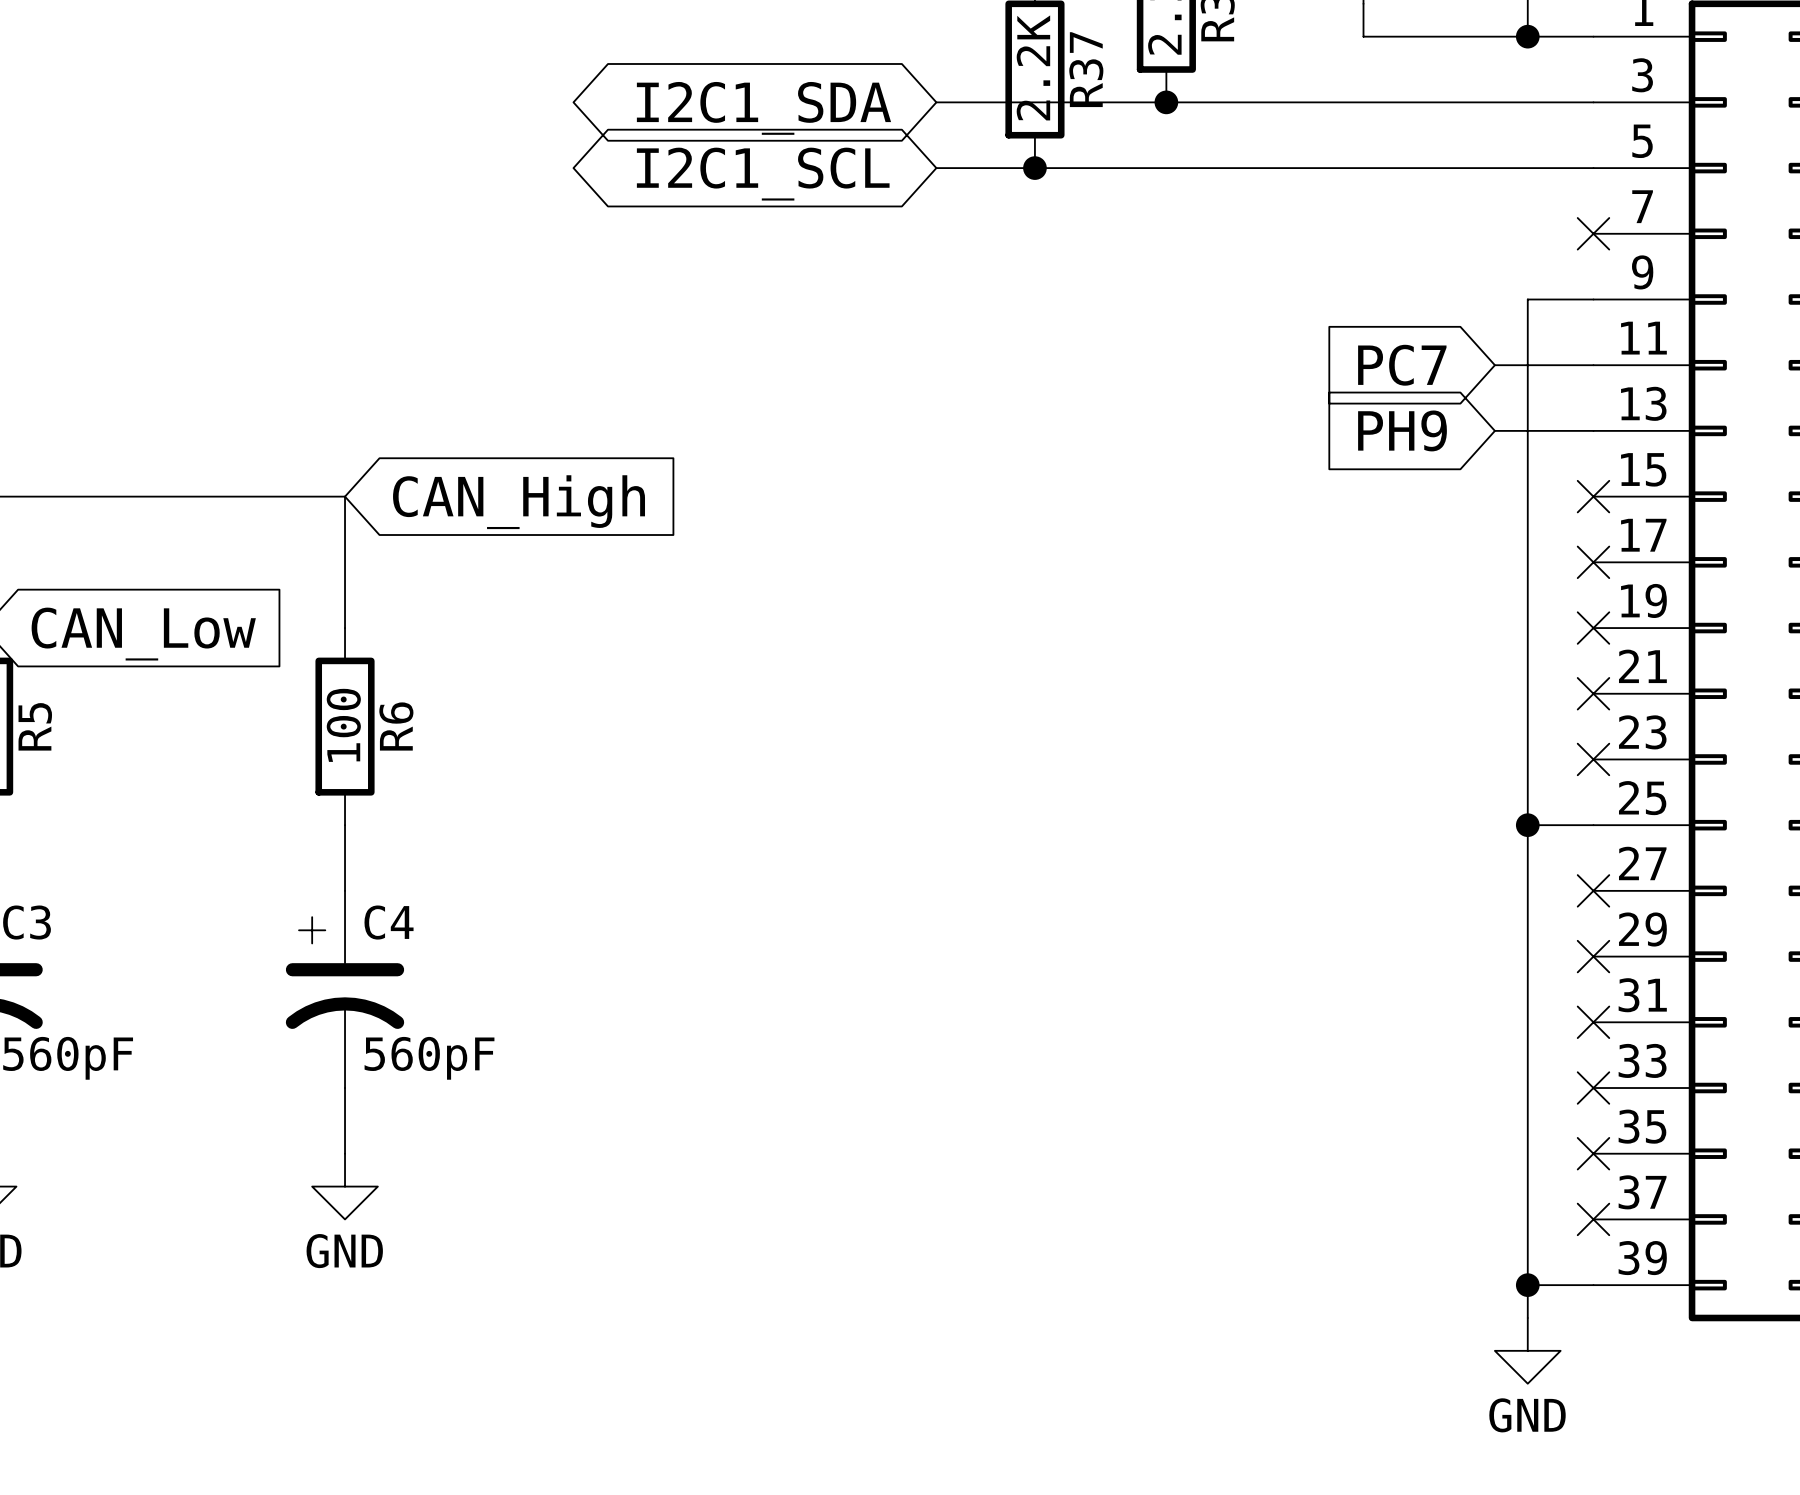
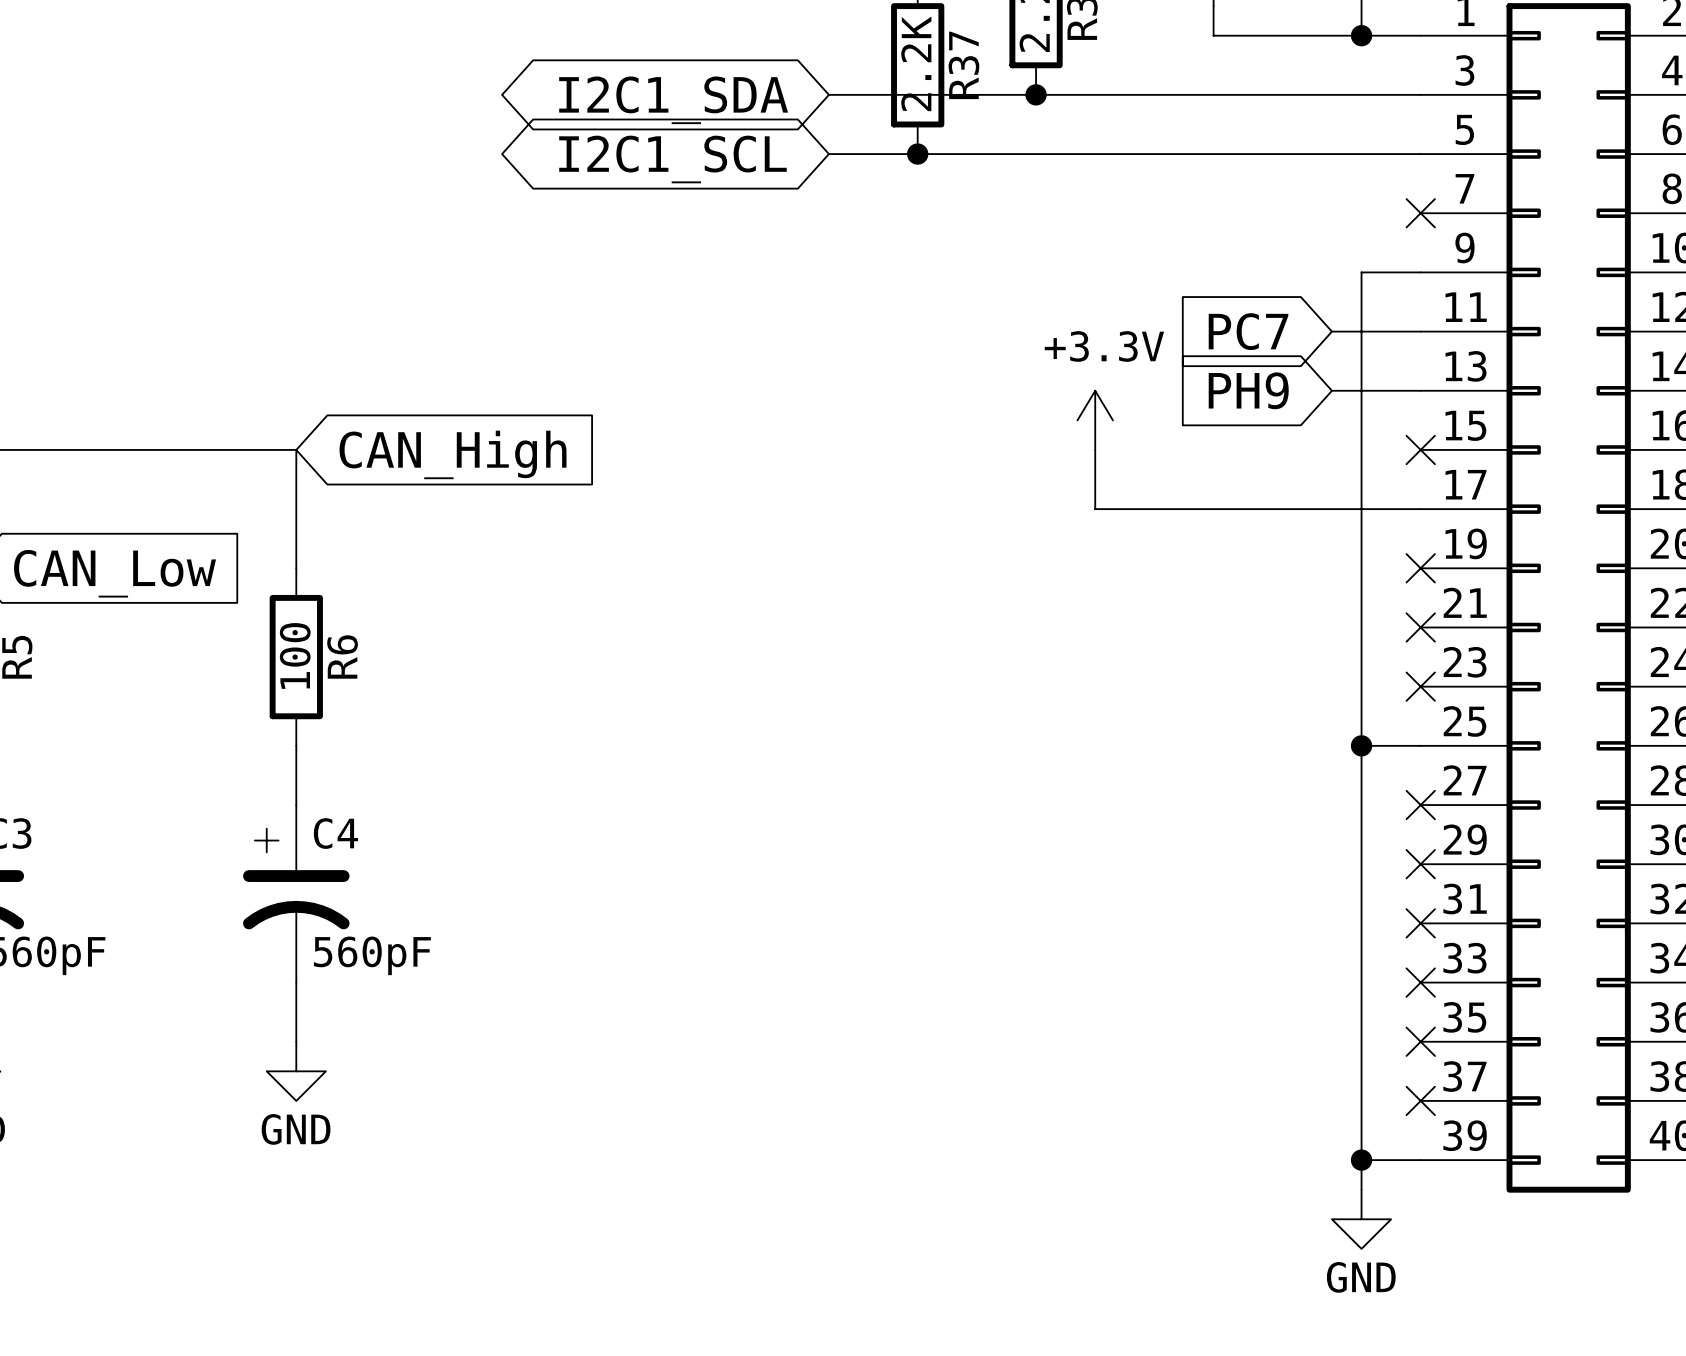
power symbol: none -> +3.3V (1095, 420)
wire: none -> (1095, 449) (1095, 509) (1420, 509)
no-connect mark: (1593, 562) -> none

